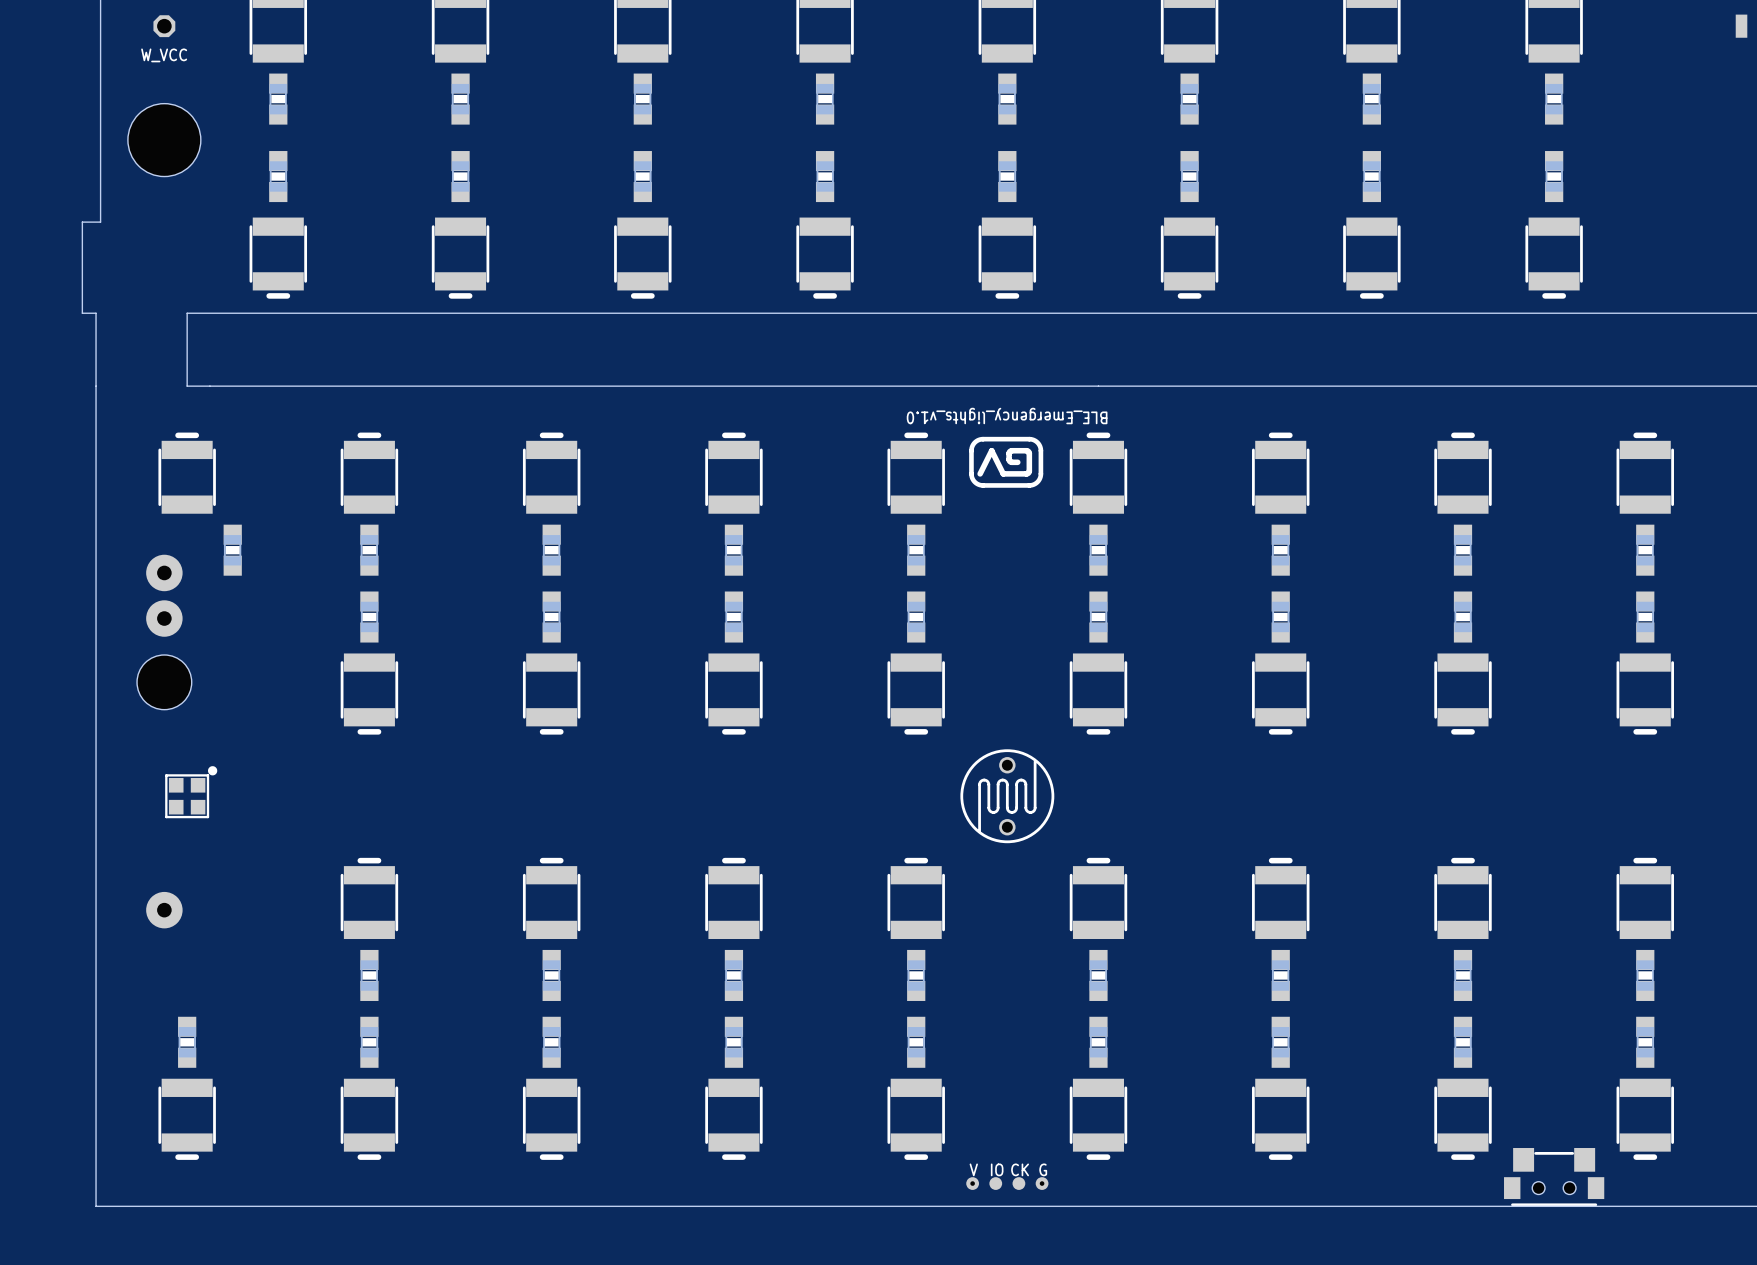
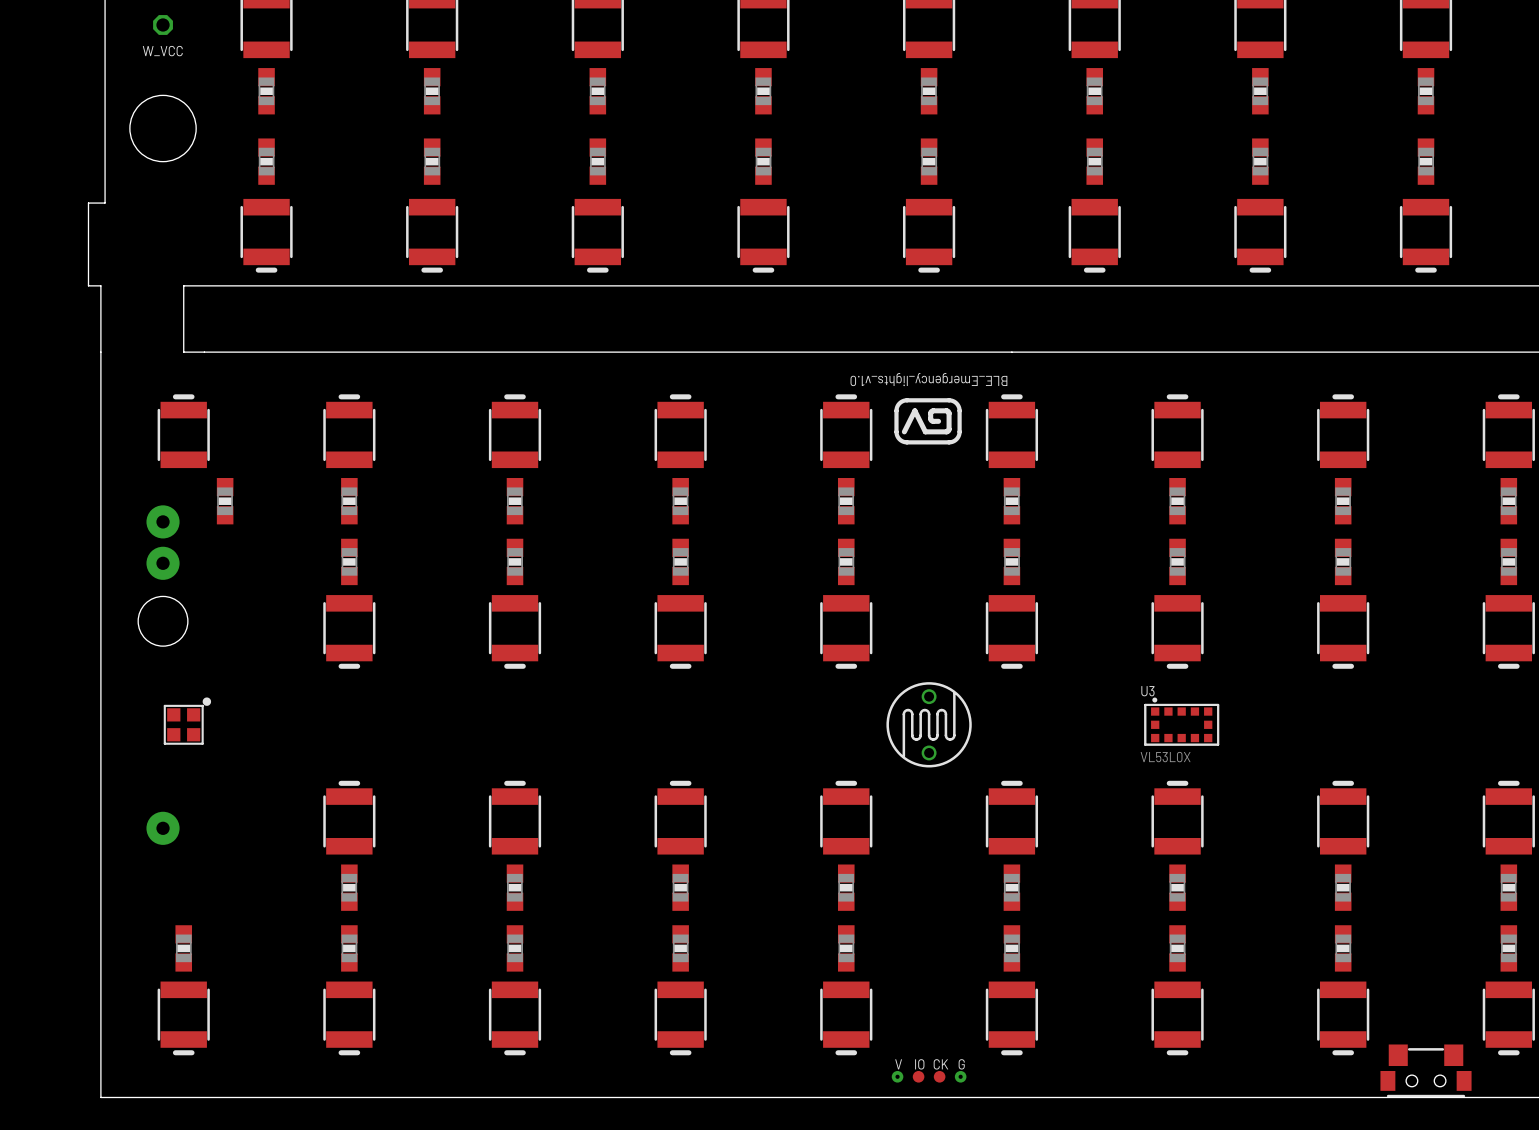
U3: none -> VL53L0X (1181, 721)

